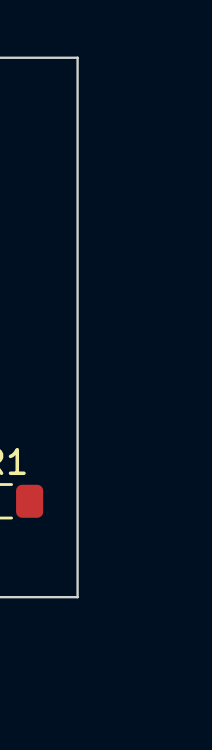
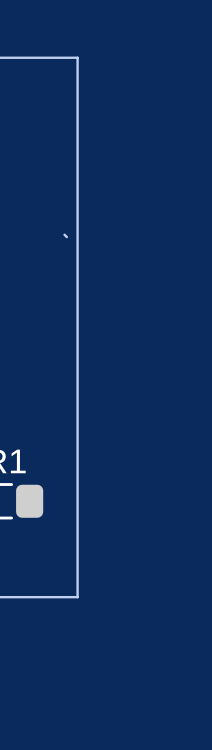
board edge: none -> (64, 234) (66, 237)

